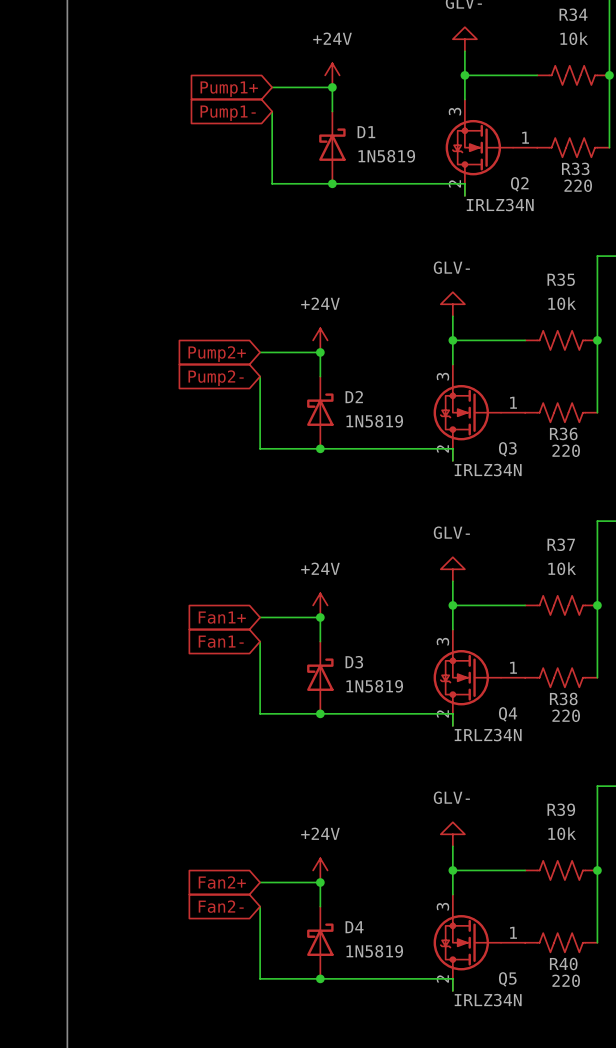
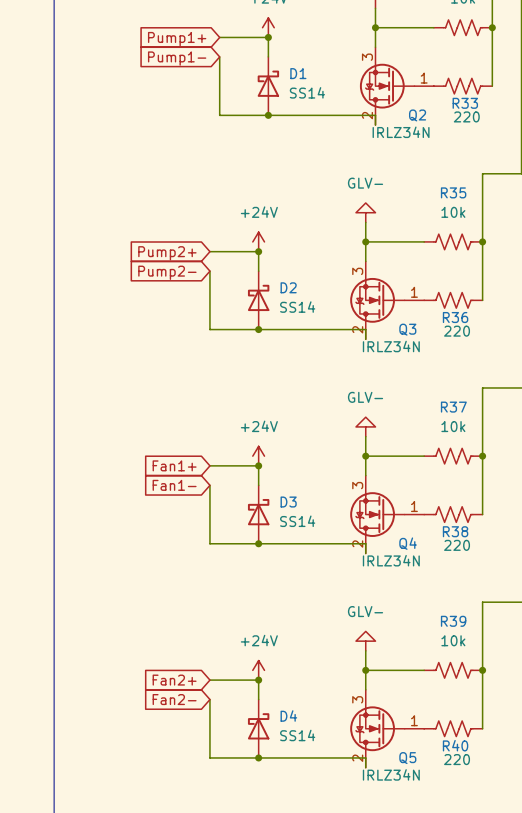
D1 value: 1N5819 (386, 156) -> SS14 (307, 92)
D2 value: 1N5819 (374, 421) -> SS14 (297, 307)
D3 value: 1N5819 (374, 686) -> SS14 (297, 521)
D4 value: 1N5819 (374, 951) -> SS14 (297, 735)

